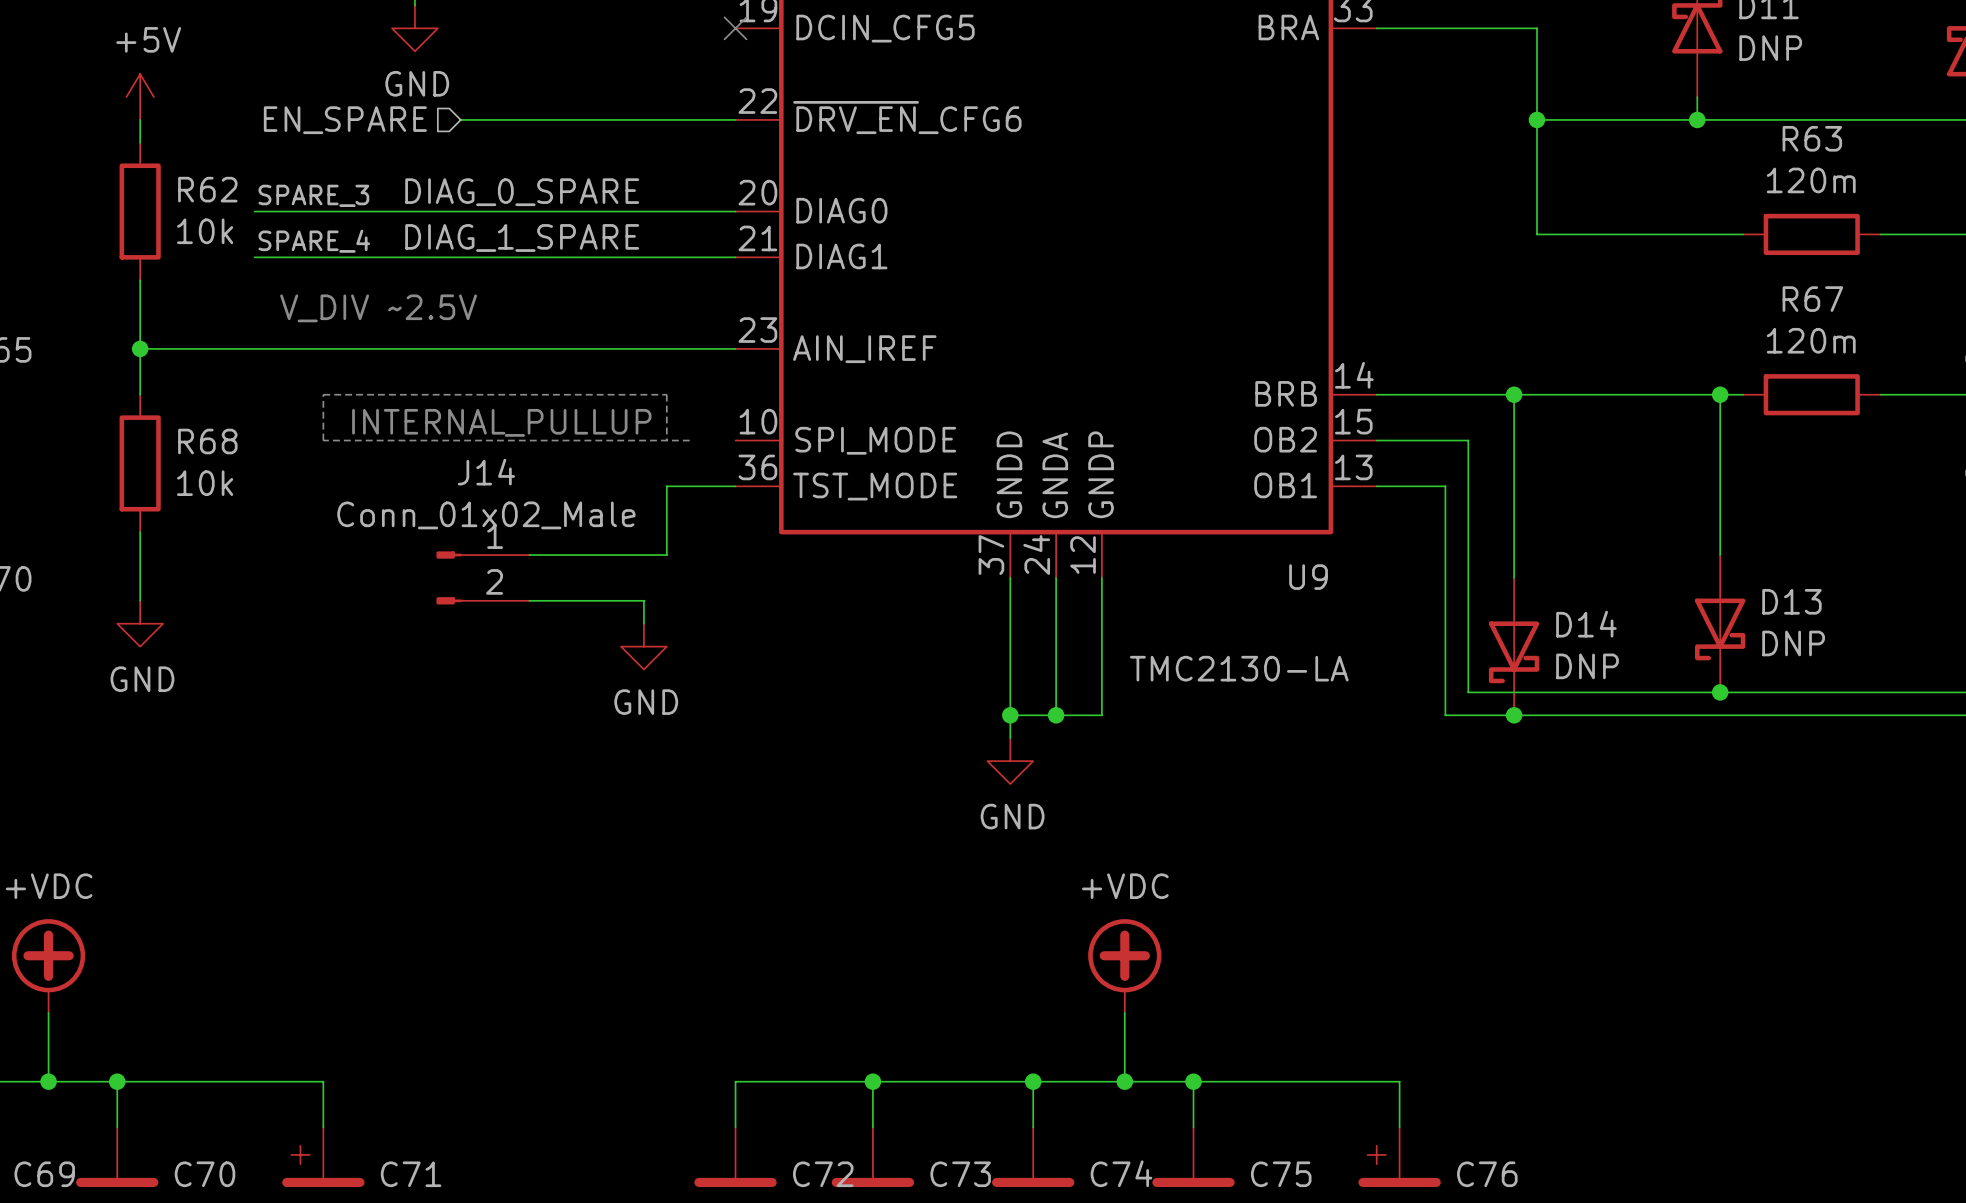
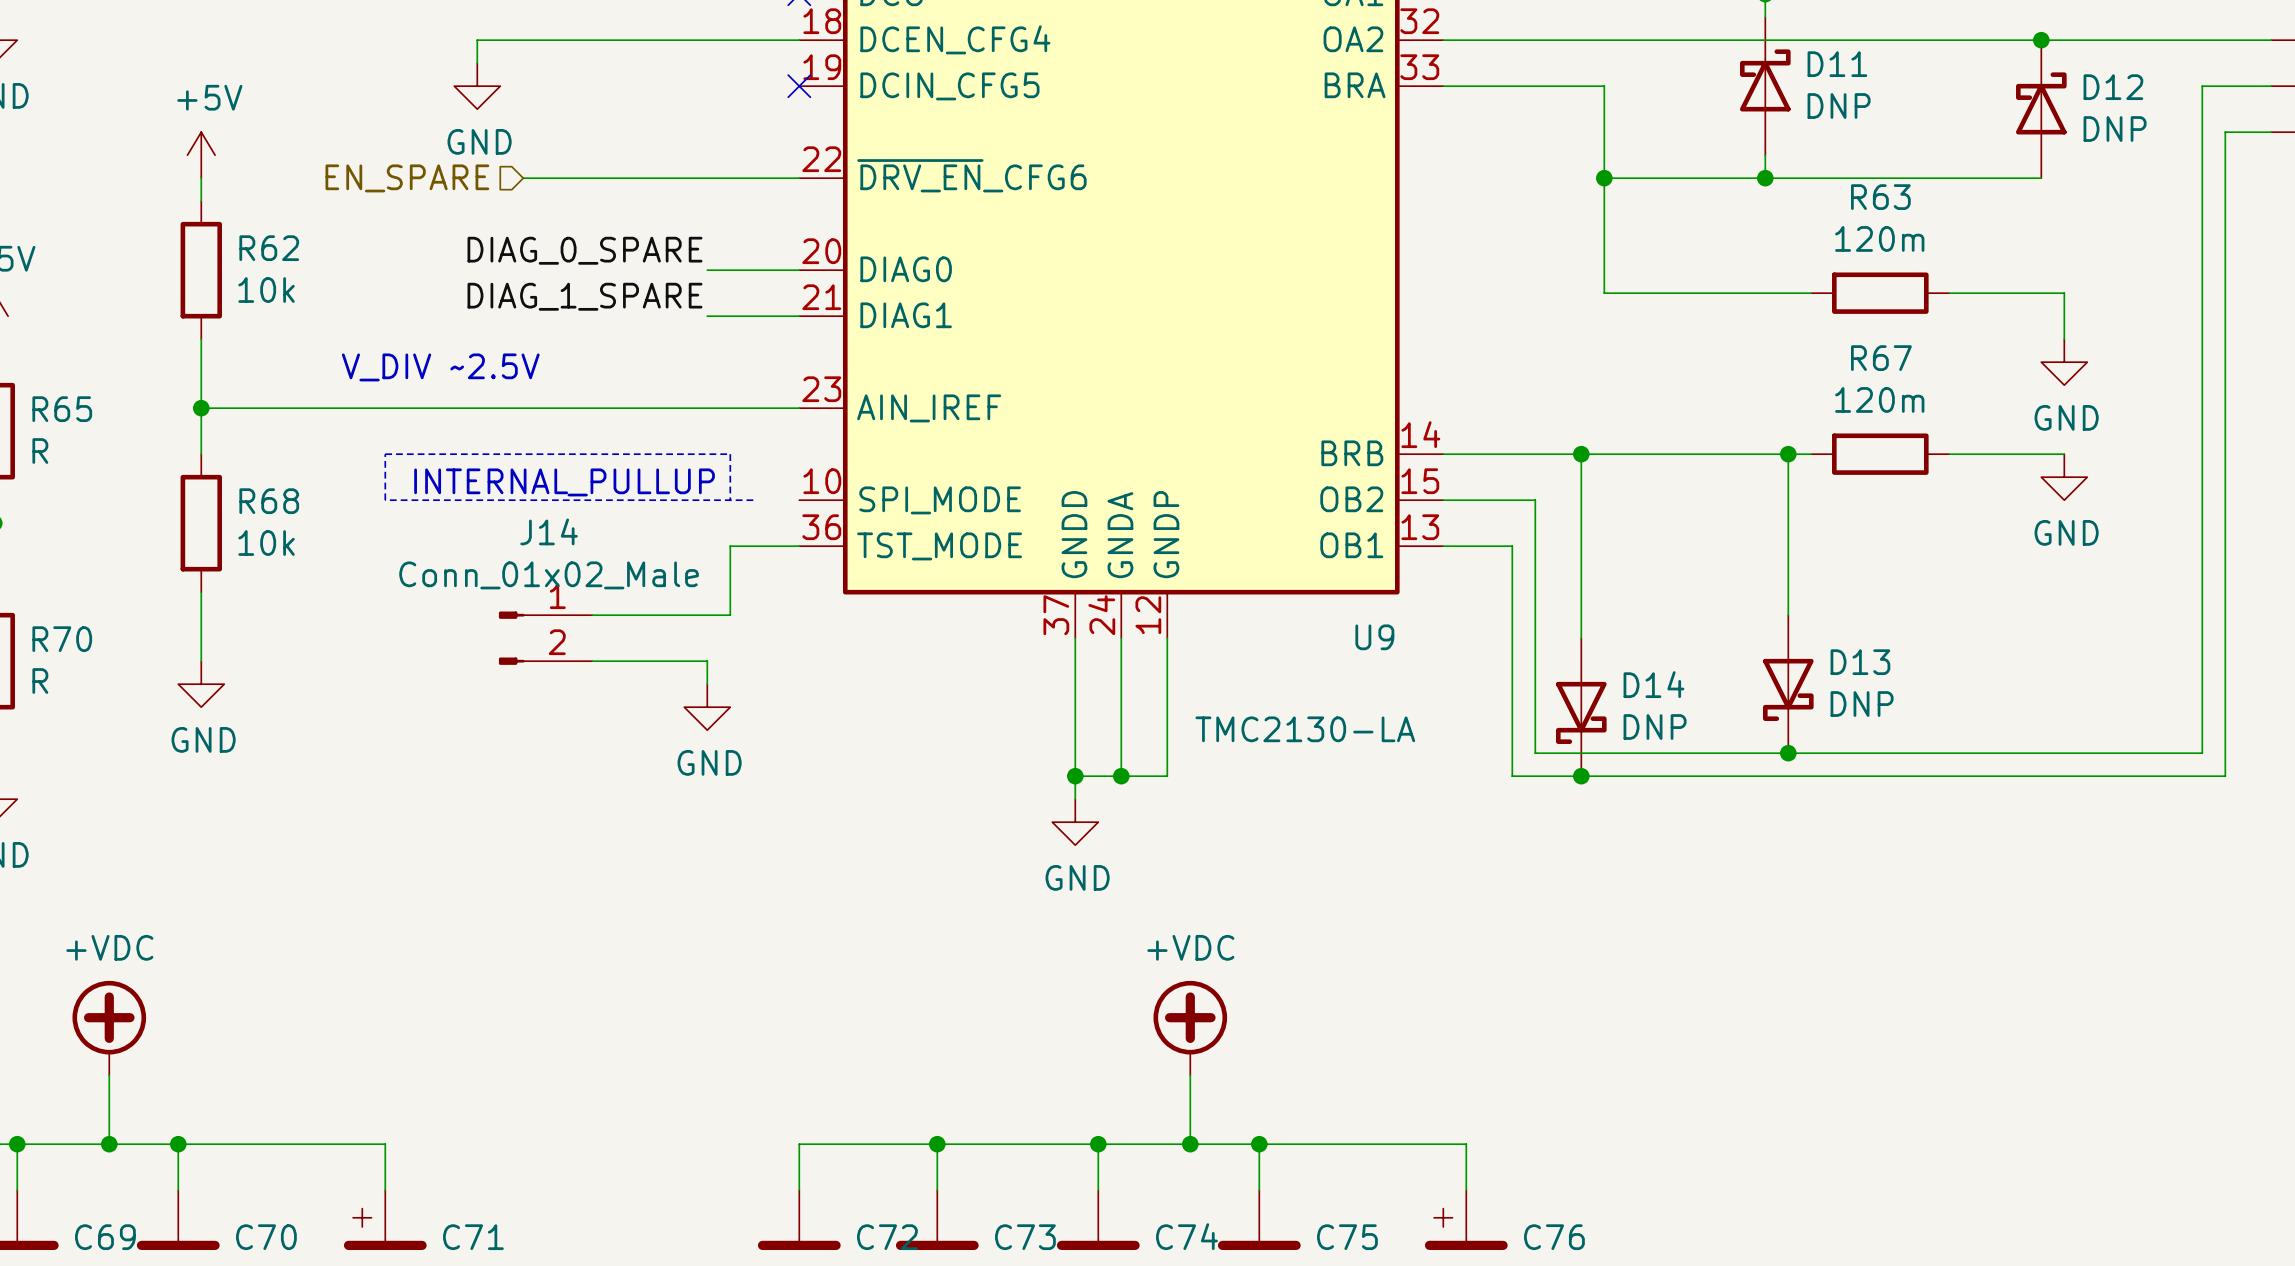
label: SPARE_3 (313, 195) -> none
wire: (254, 211) (643, 211) -> none
label: SPARE_4 (314, 241) -> none
wire: (254, 257) (643, 257) -> none

